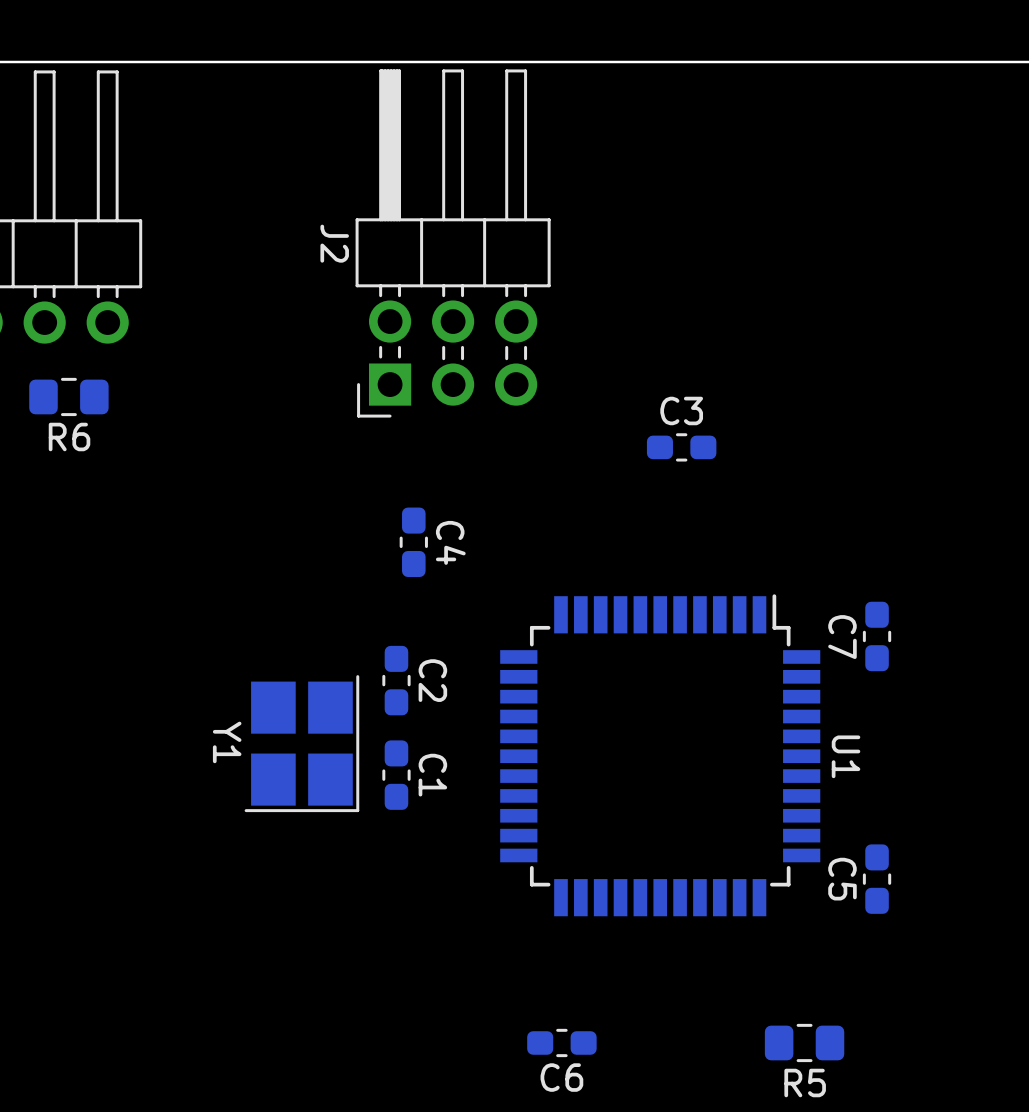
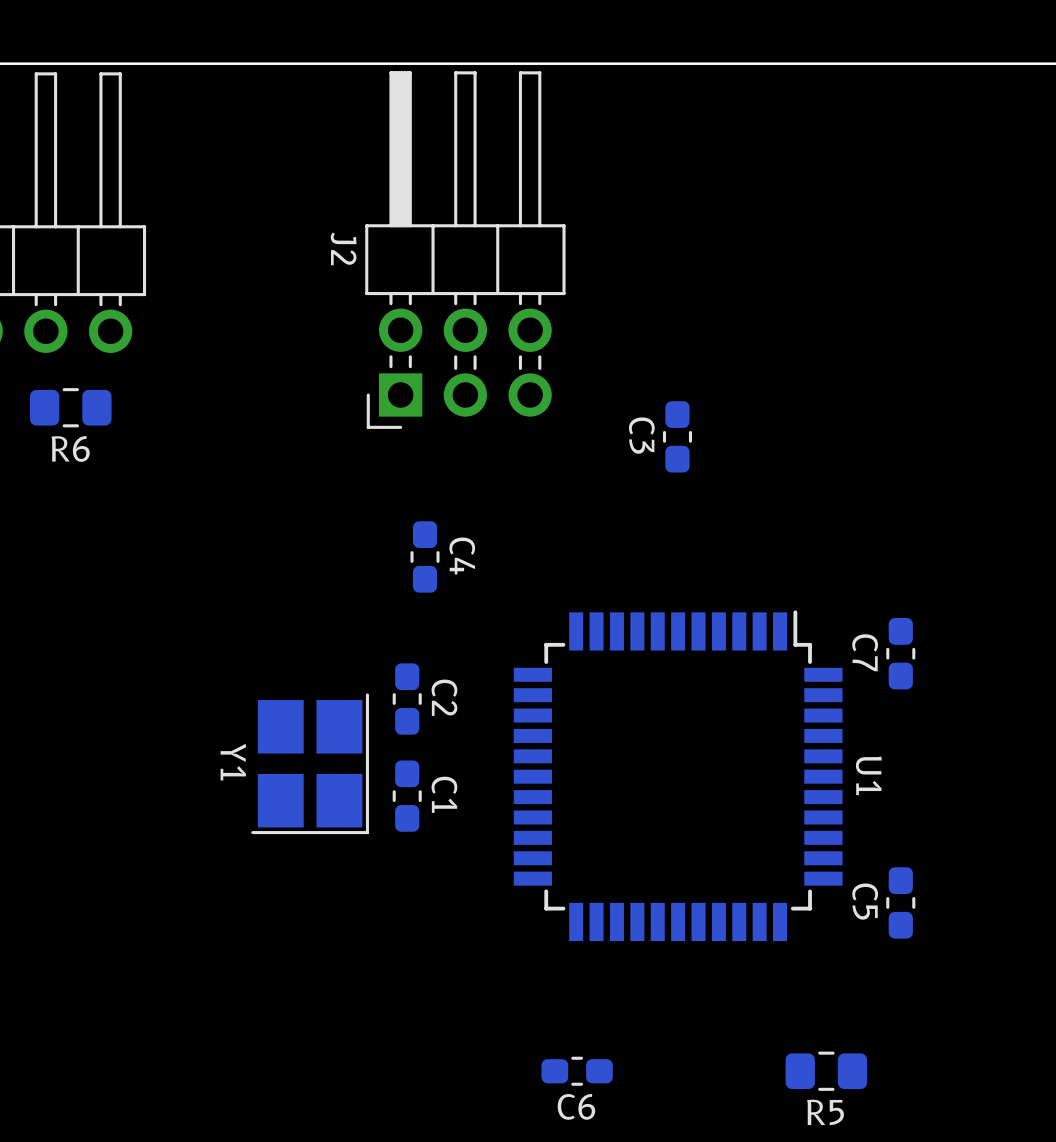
C3 name position: C3 (681, 410) -> C3 (641, 435)
C3 rotation: 0° (681, 447) -> 90° clockwise (677, 436)

